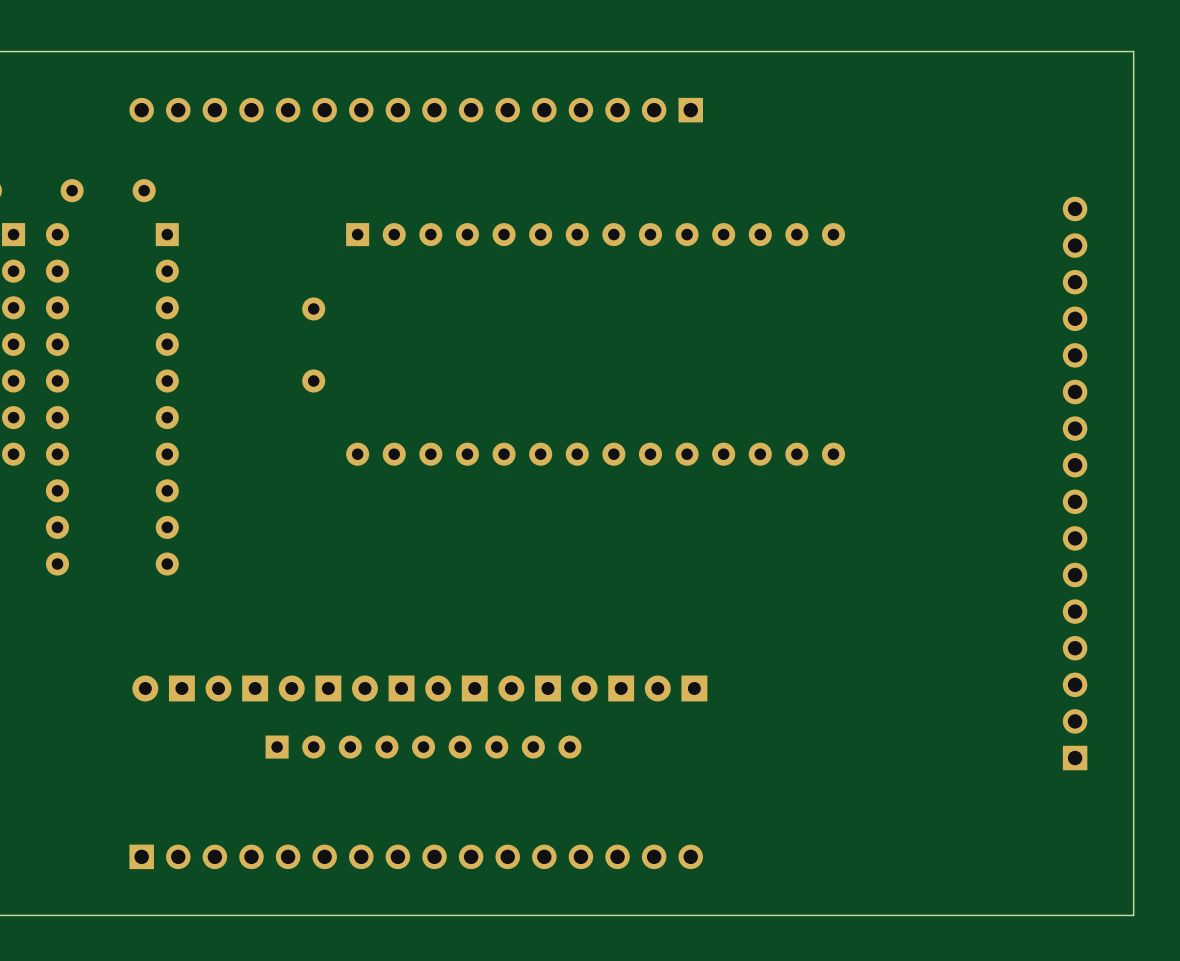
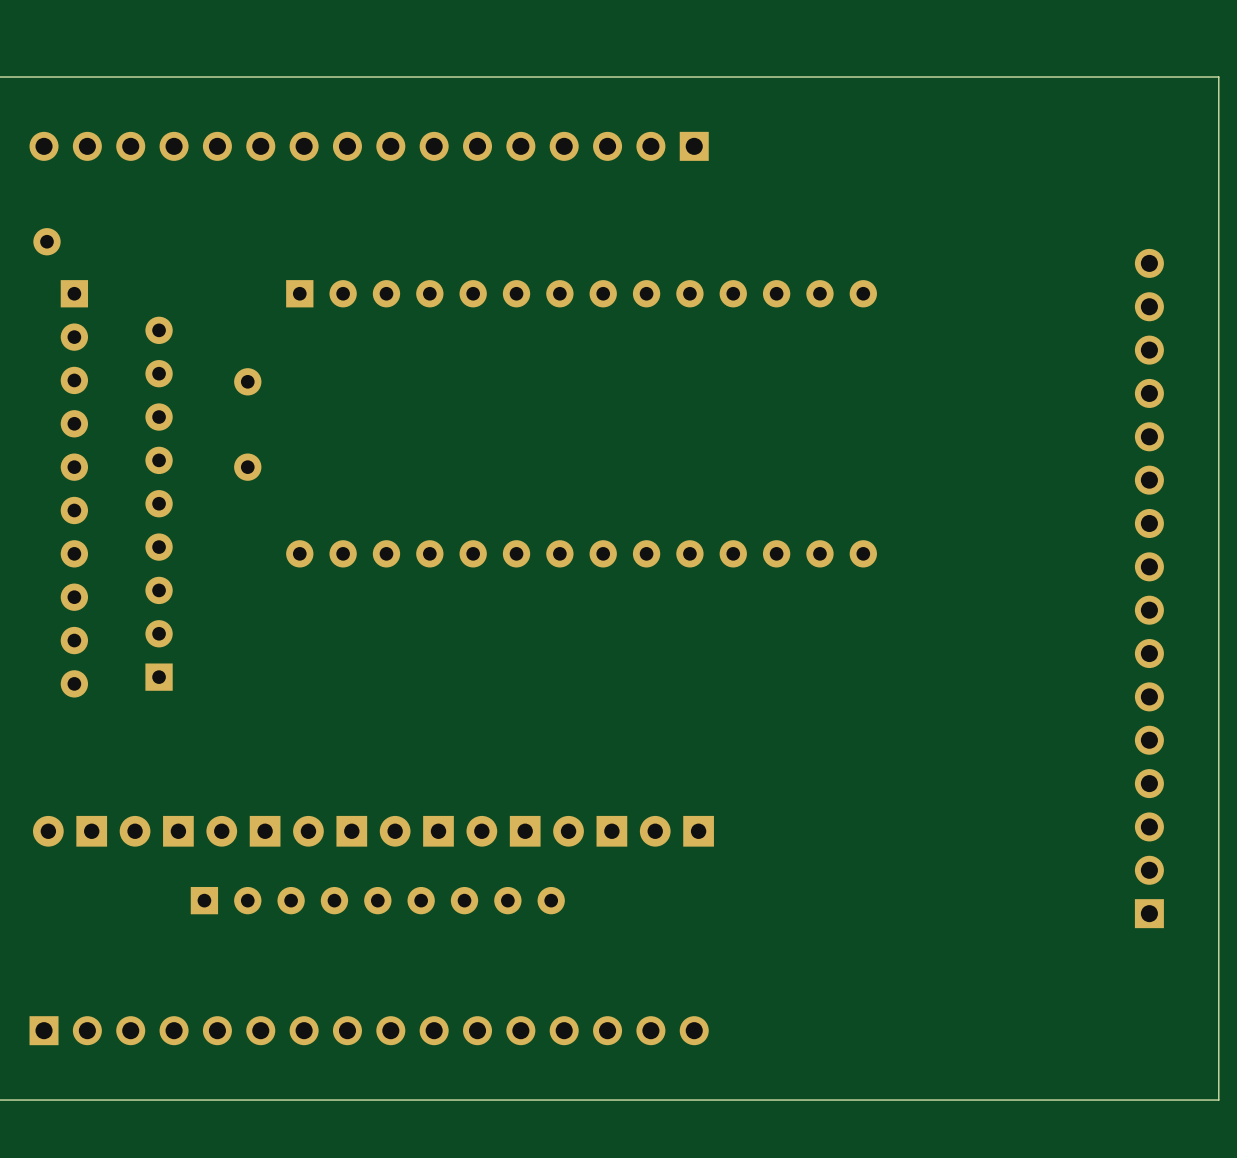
part: none -> (159, 503)

